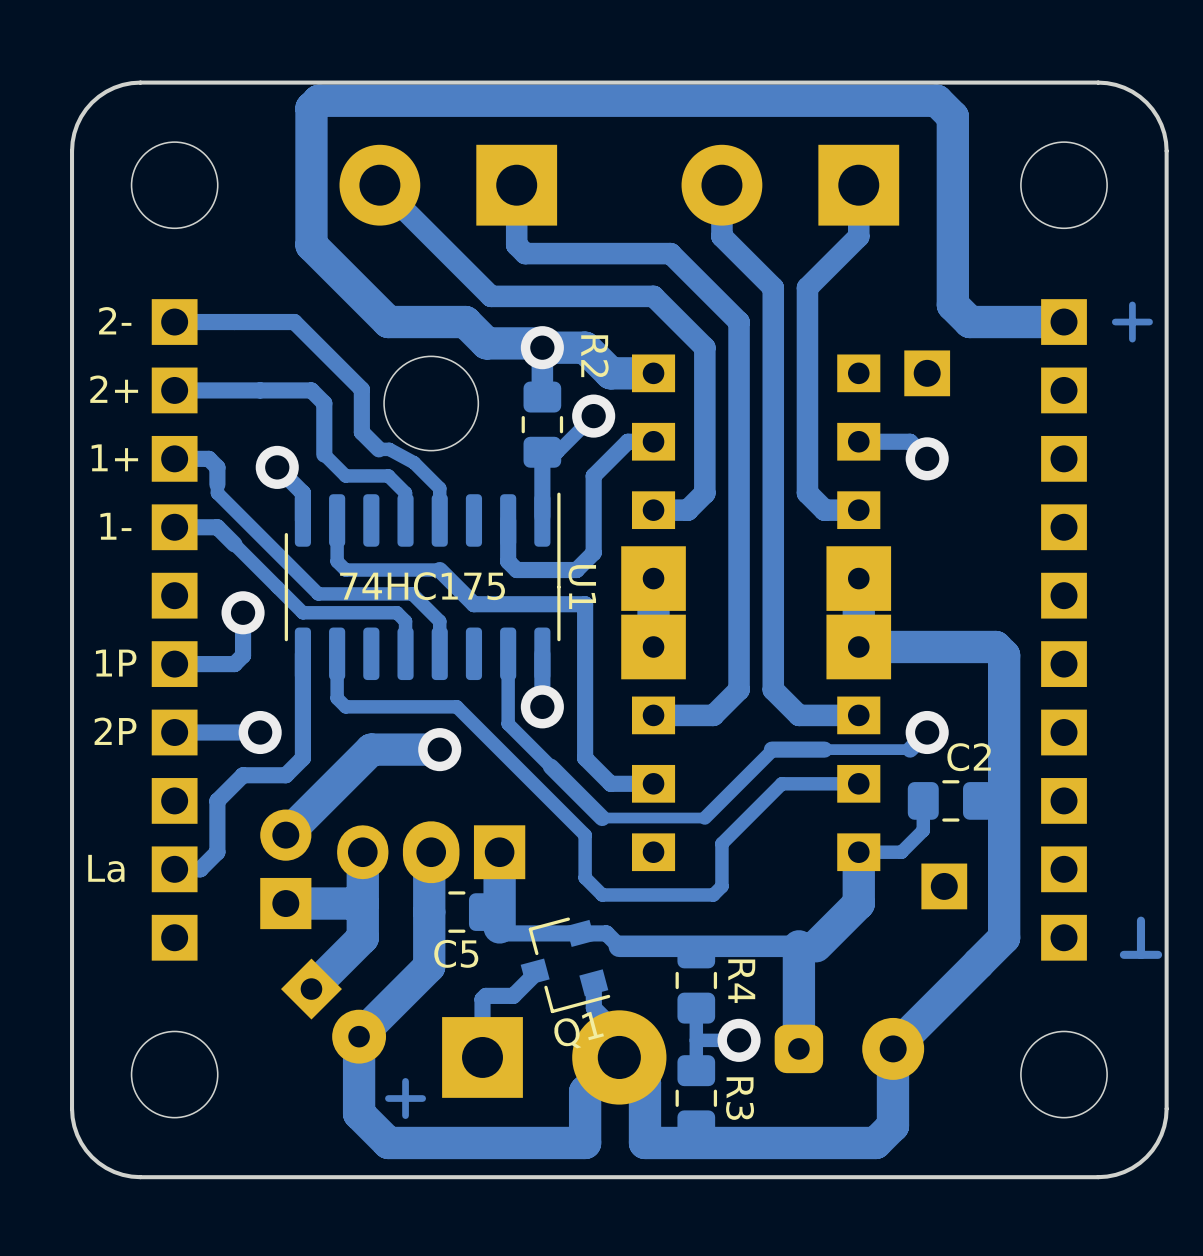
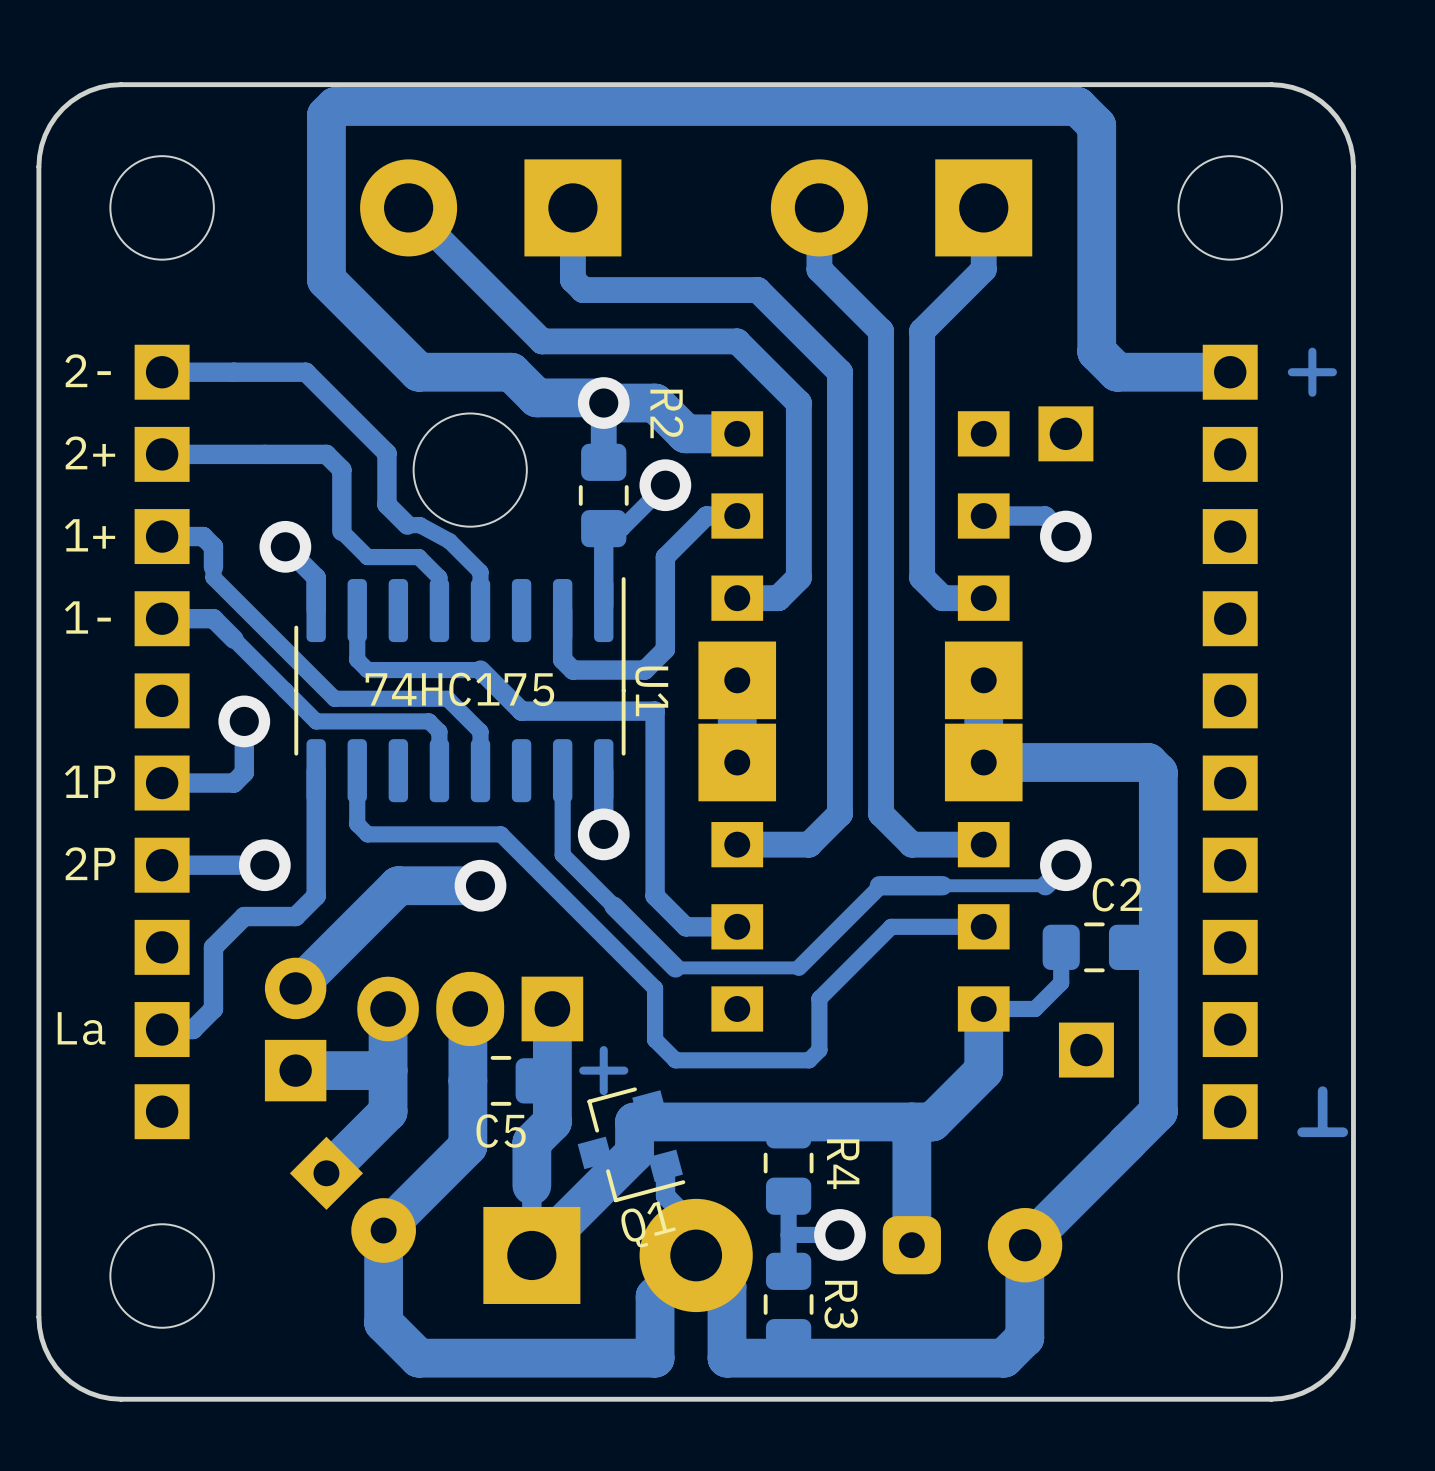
track: (499, 927) (505, 933) (606, 933) (619, 946) -> (531, 1255) (634, 1152) (634, 1121) (696, 1121)
track width: thin (816, 946) (619, 946) -> thick (932, 1121) (696, 1121)
track: (531, 977) (513, 995) (485, 995) (482, 999) -> (552, 1099) (552, 1121) (531, 1142) (531, 1185)
track: (405, 1081) (405, 1115) -> (603, 1050) (603, 1091)
track: (422, 1098) (388, 1098) -> (624, 1070) (583, 1070)

